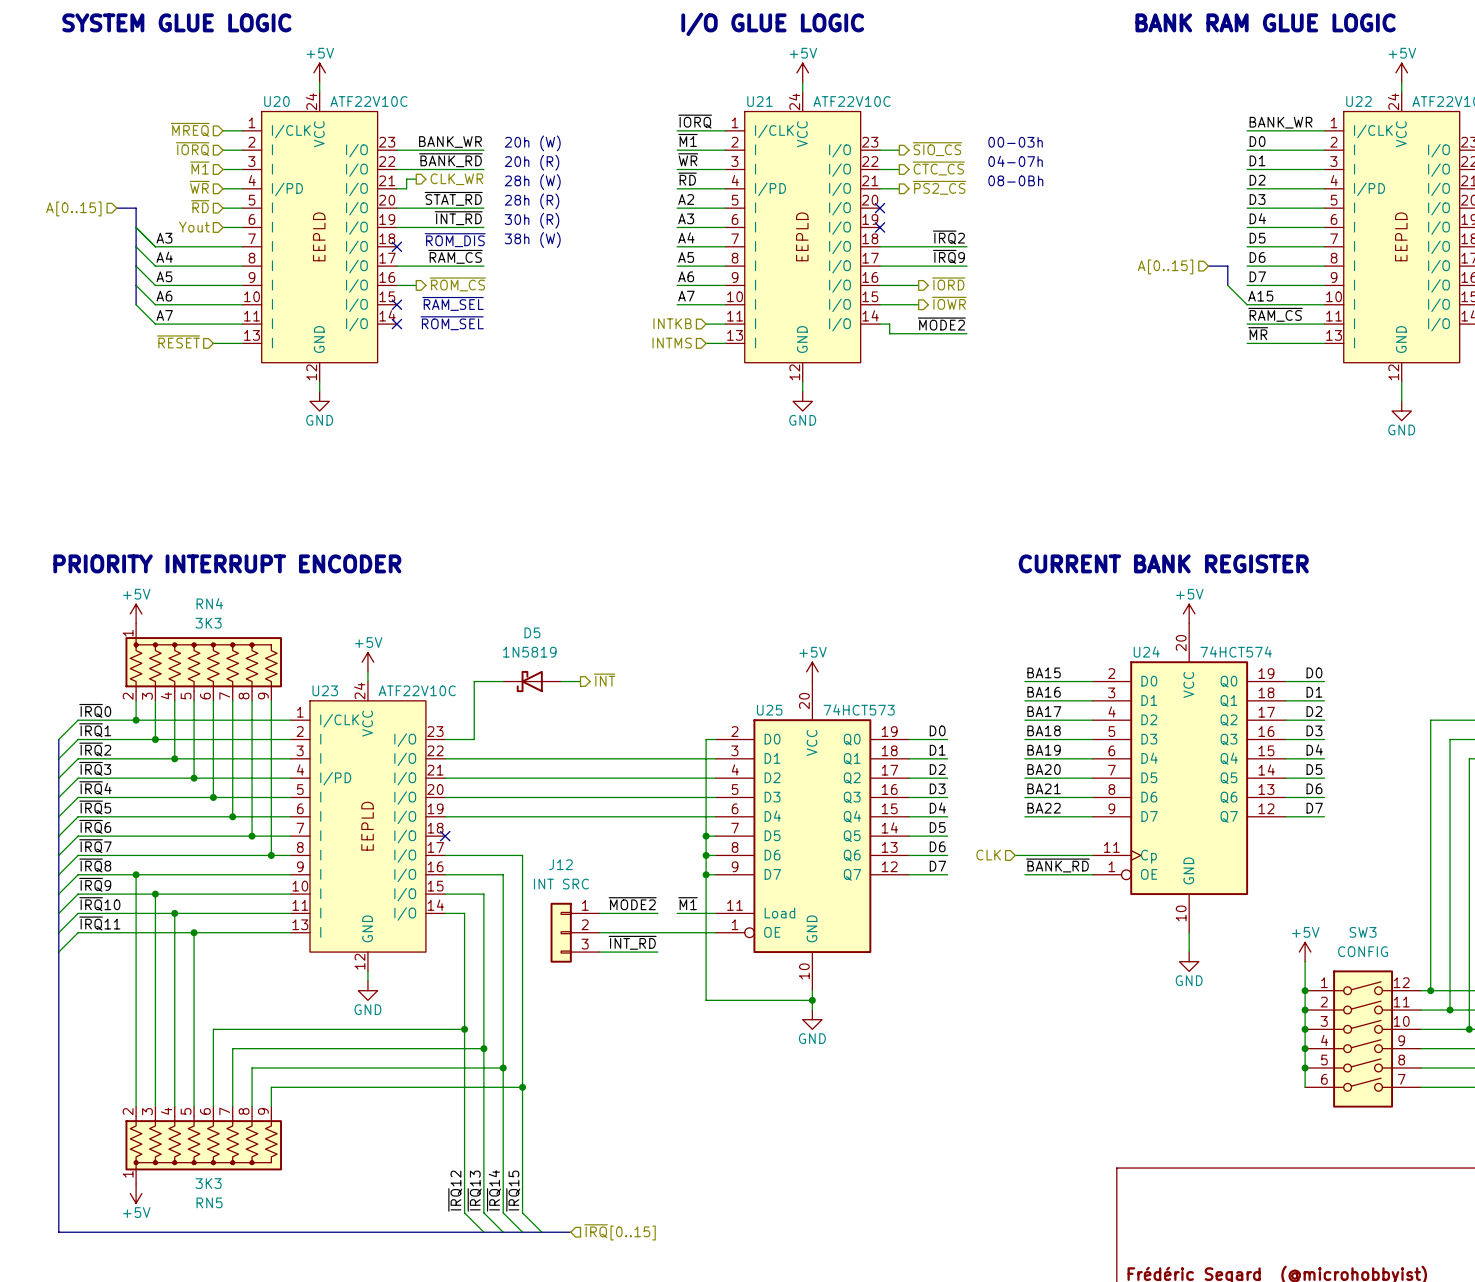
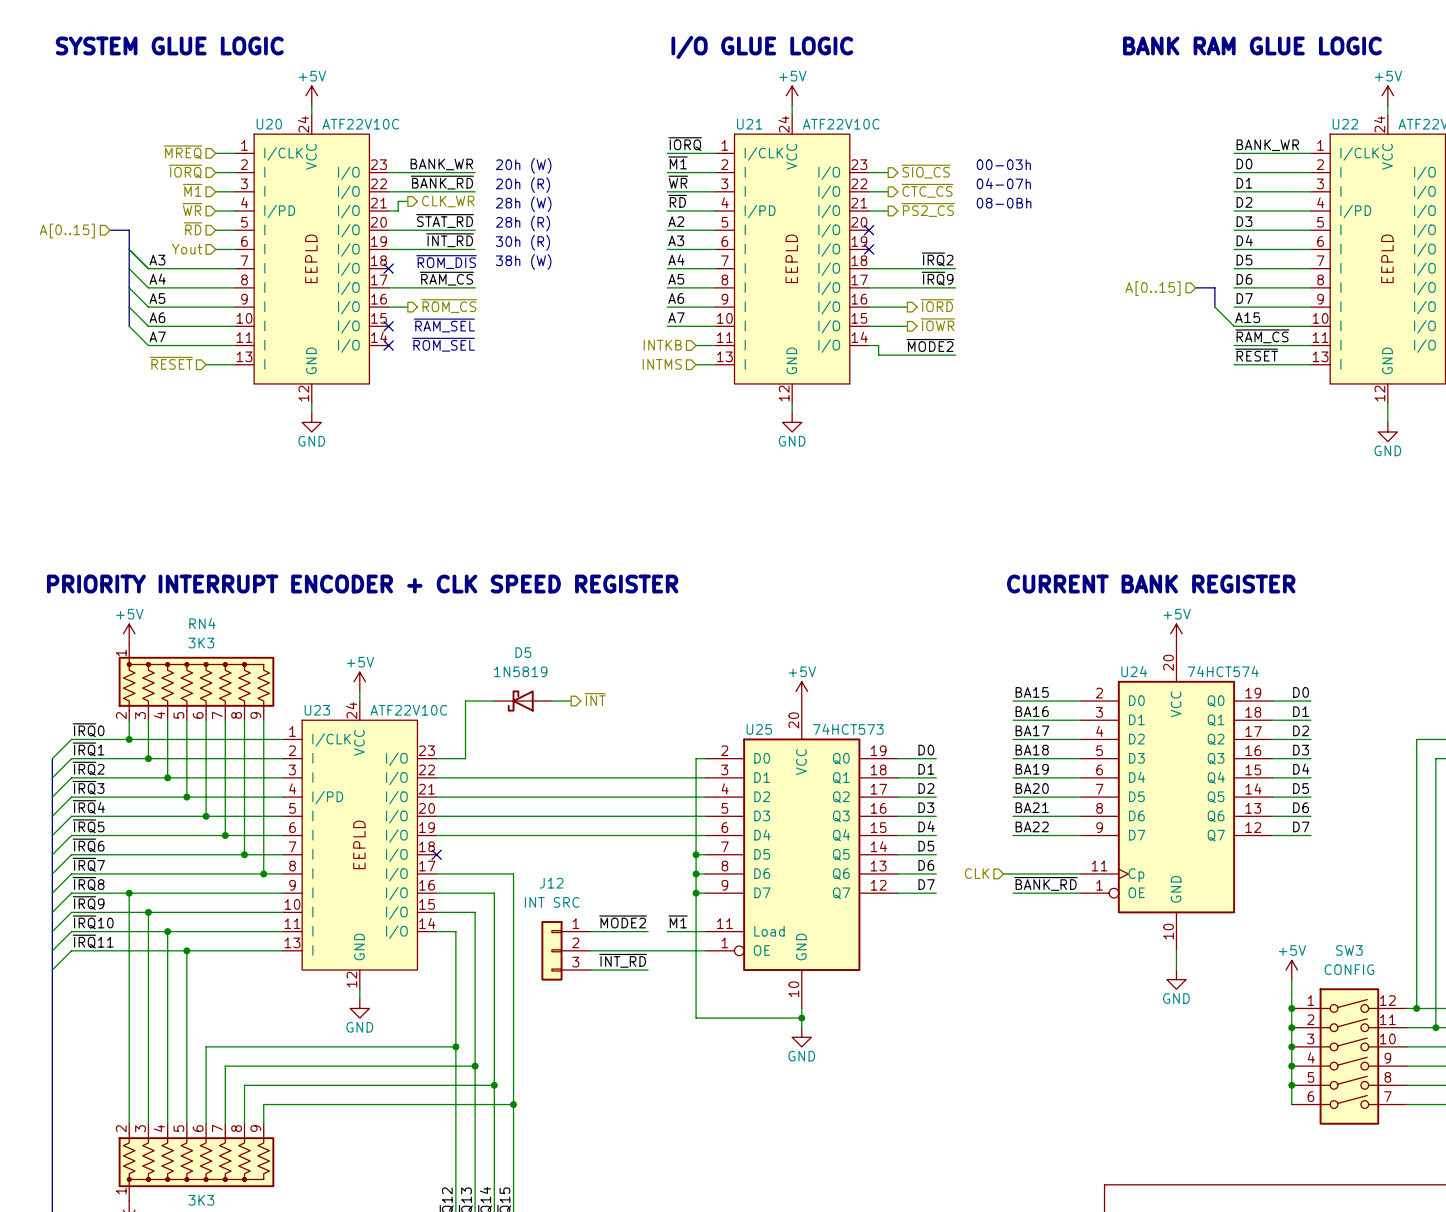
label: ~{MR} (1258, 333) -> ~{RESET} (1256, 355)
text: PRIORITY INTERRUPT ENCODER (227, 563) -> PRIORITY INTERRUPT ENCODER + CLK SPEED REGISTER (362, 584)

